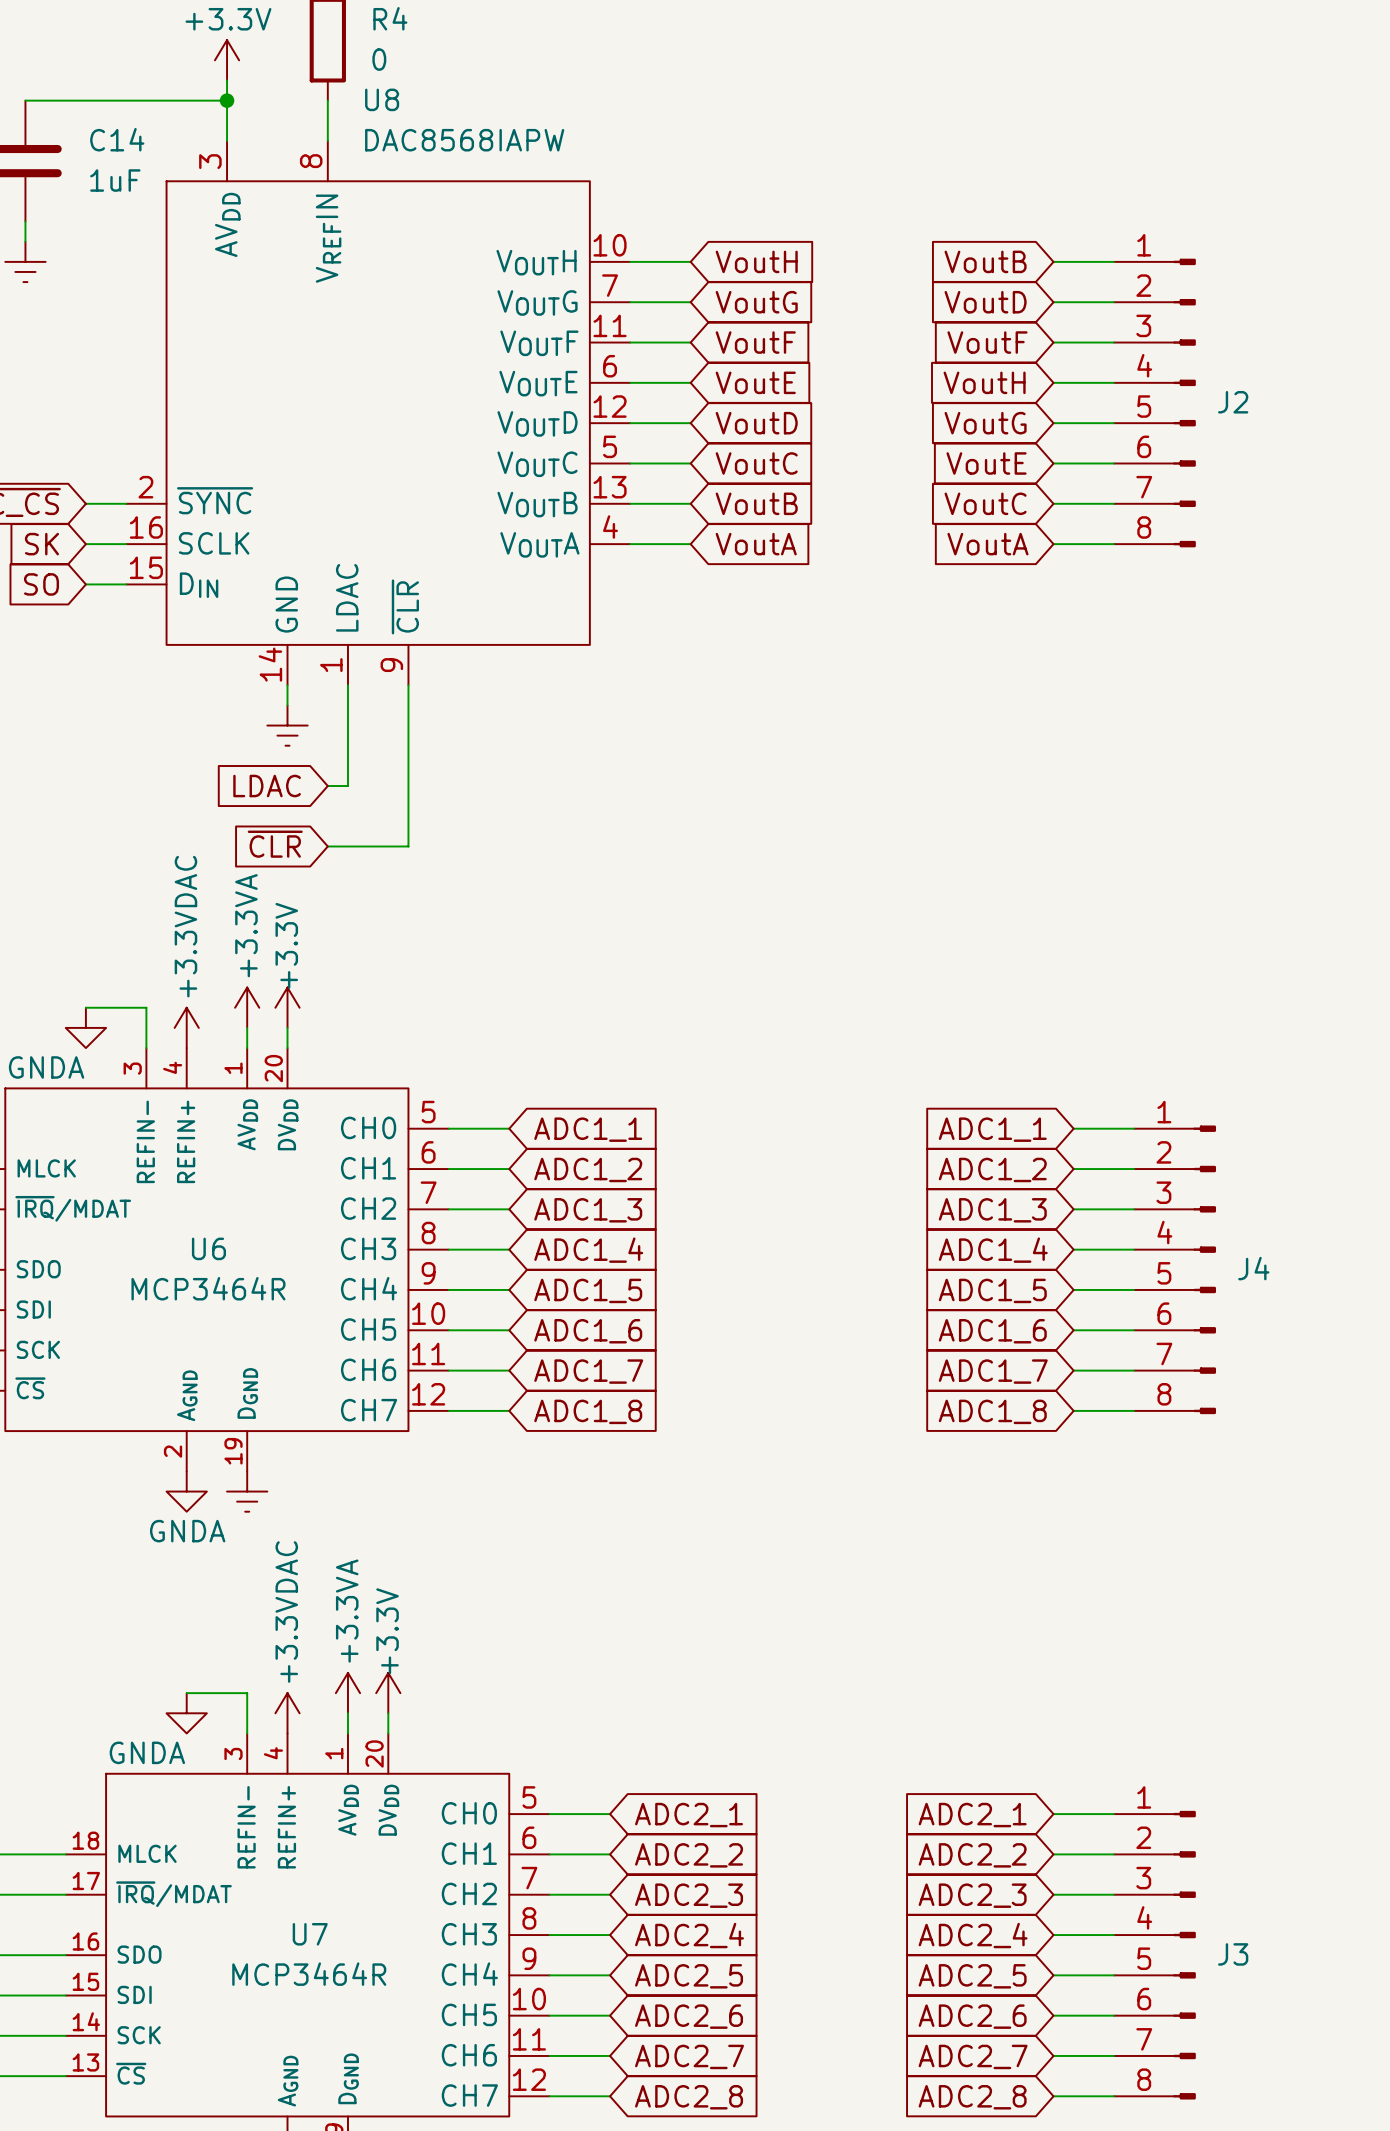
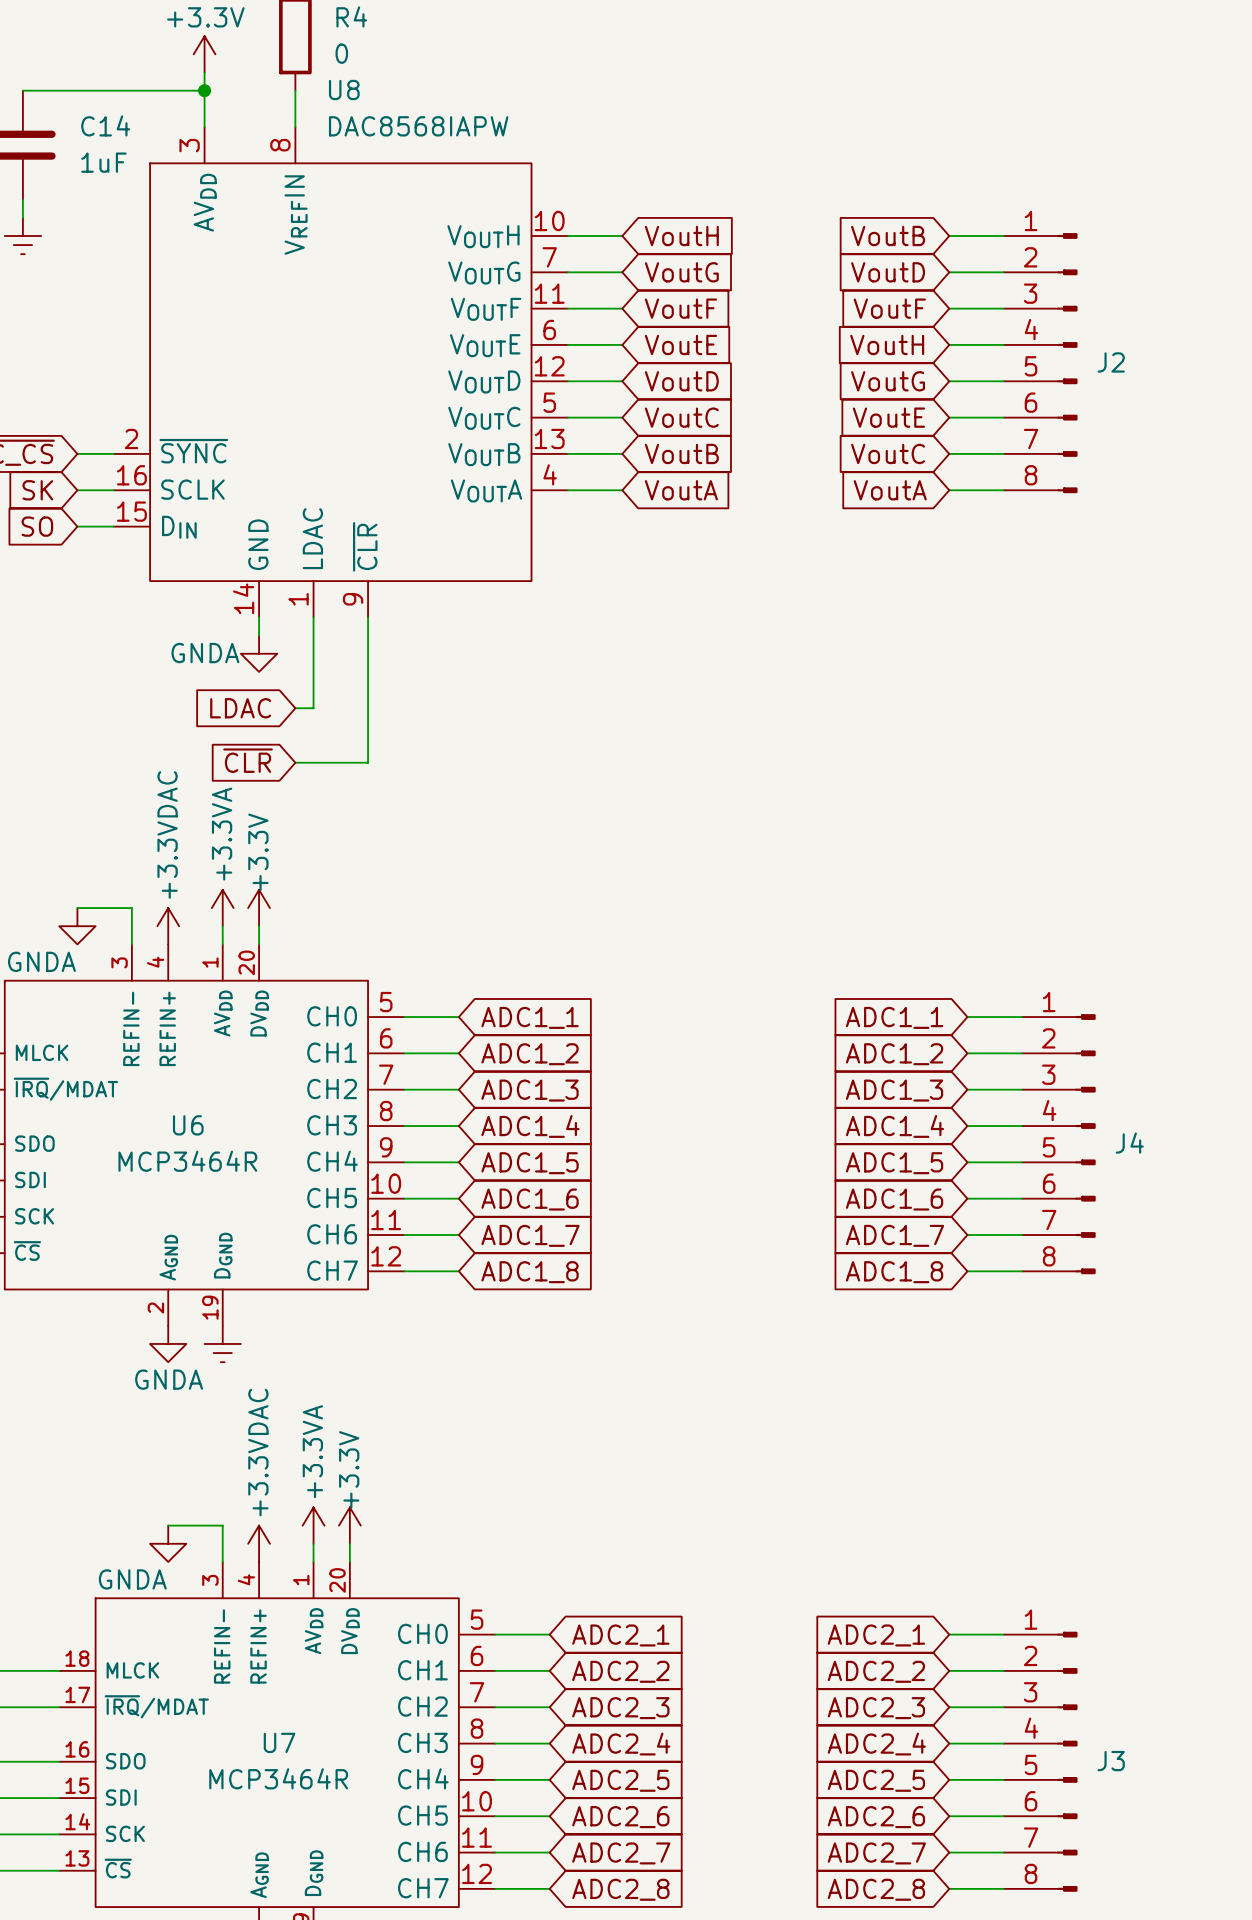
power symbol shape: [267, 705, 308, 746] -> [240, 635, 278, 672]
power symbol text: none -> GNDA (205, 653)

